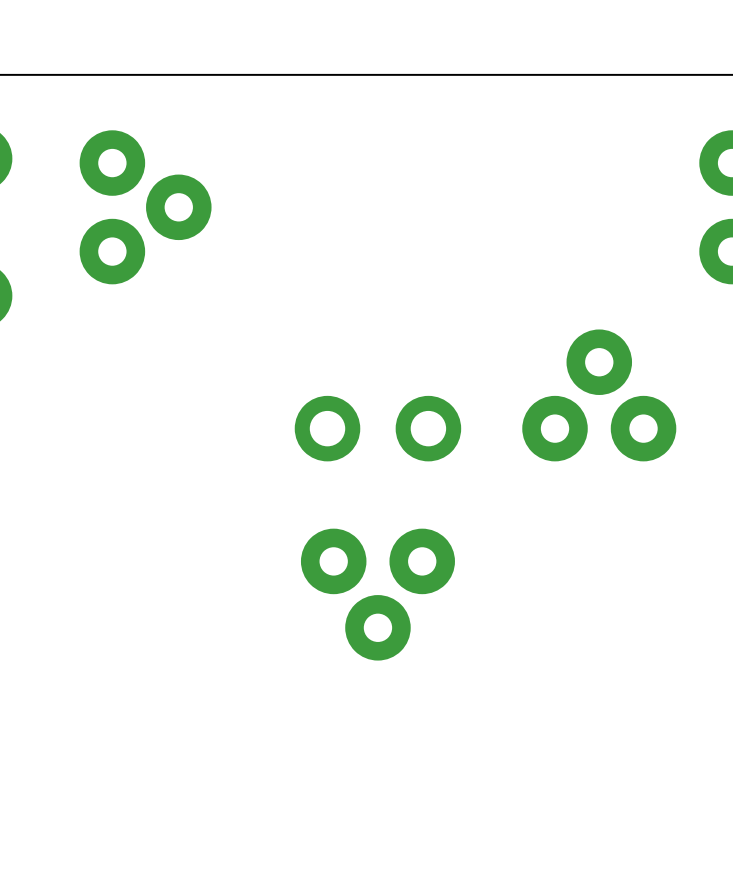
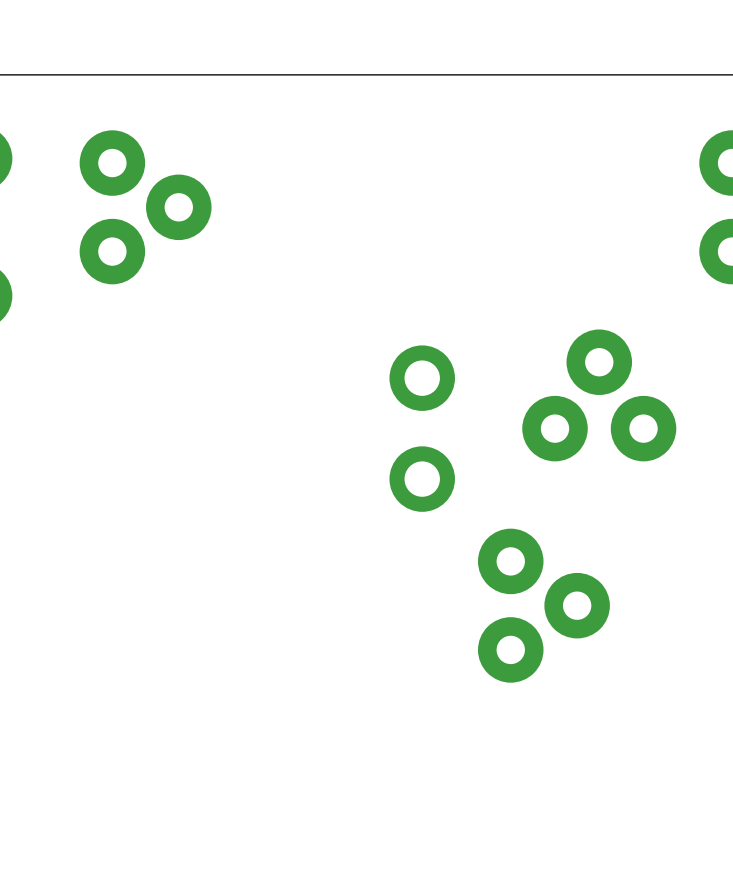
part rotation: 0° (377, 428) -> 90° clockwise (422, 428)
part rotation: 0° (377, 594) -> 90° counterclockwise (543, 605)
part position: (377, 594) -> (543, 605)

